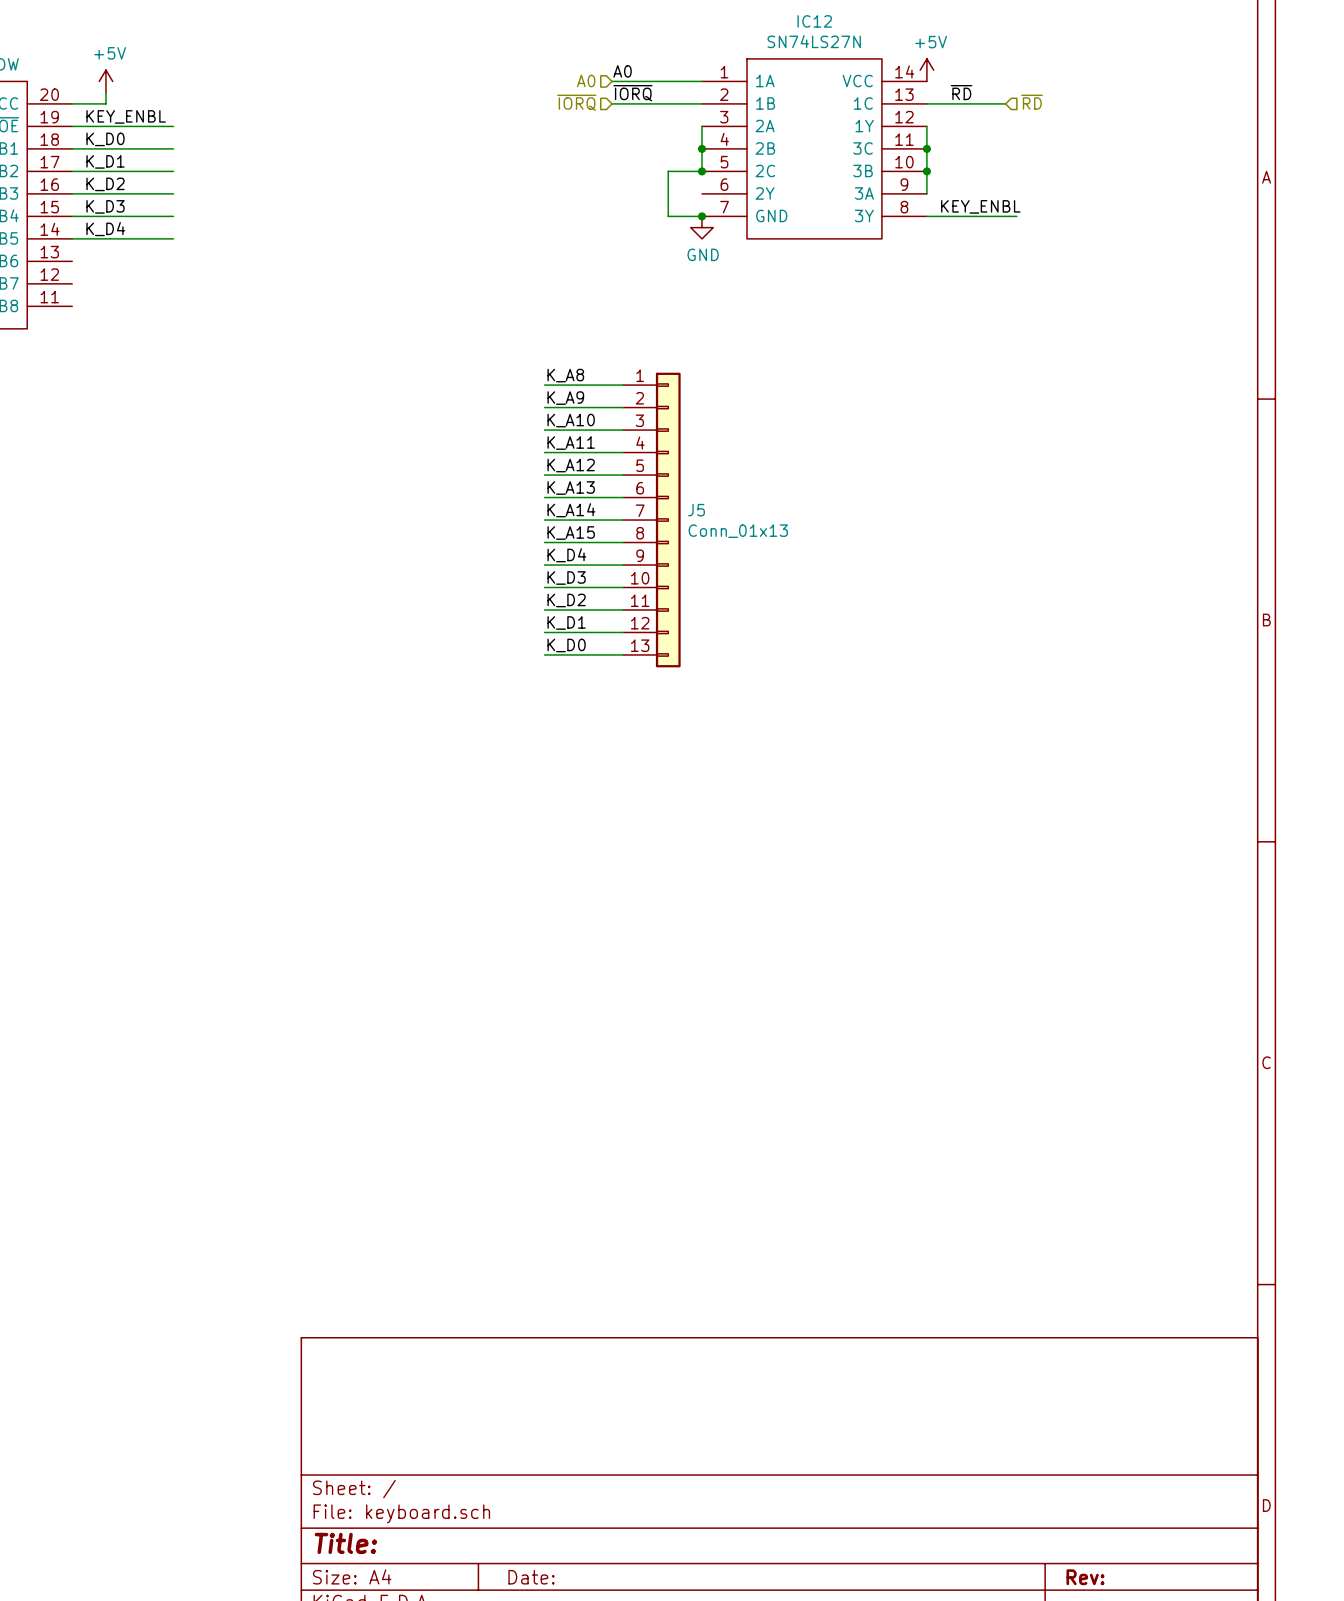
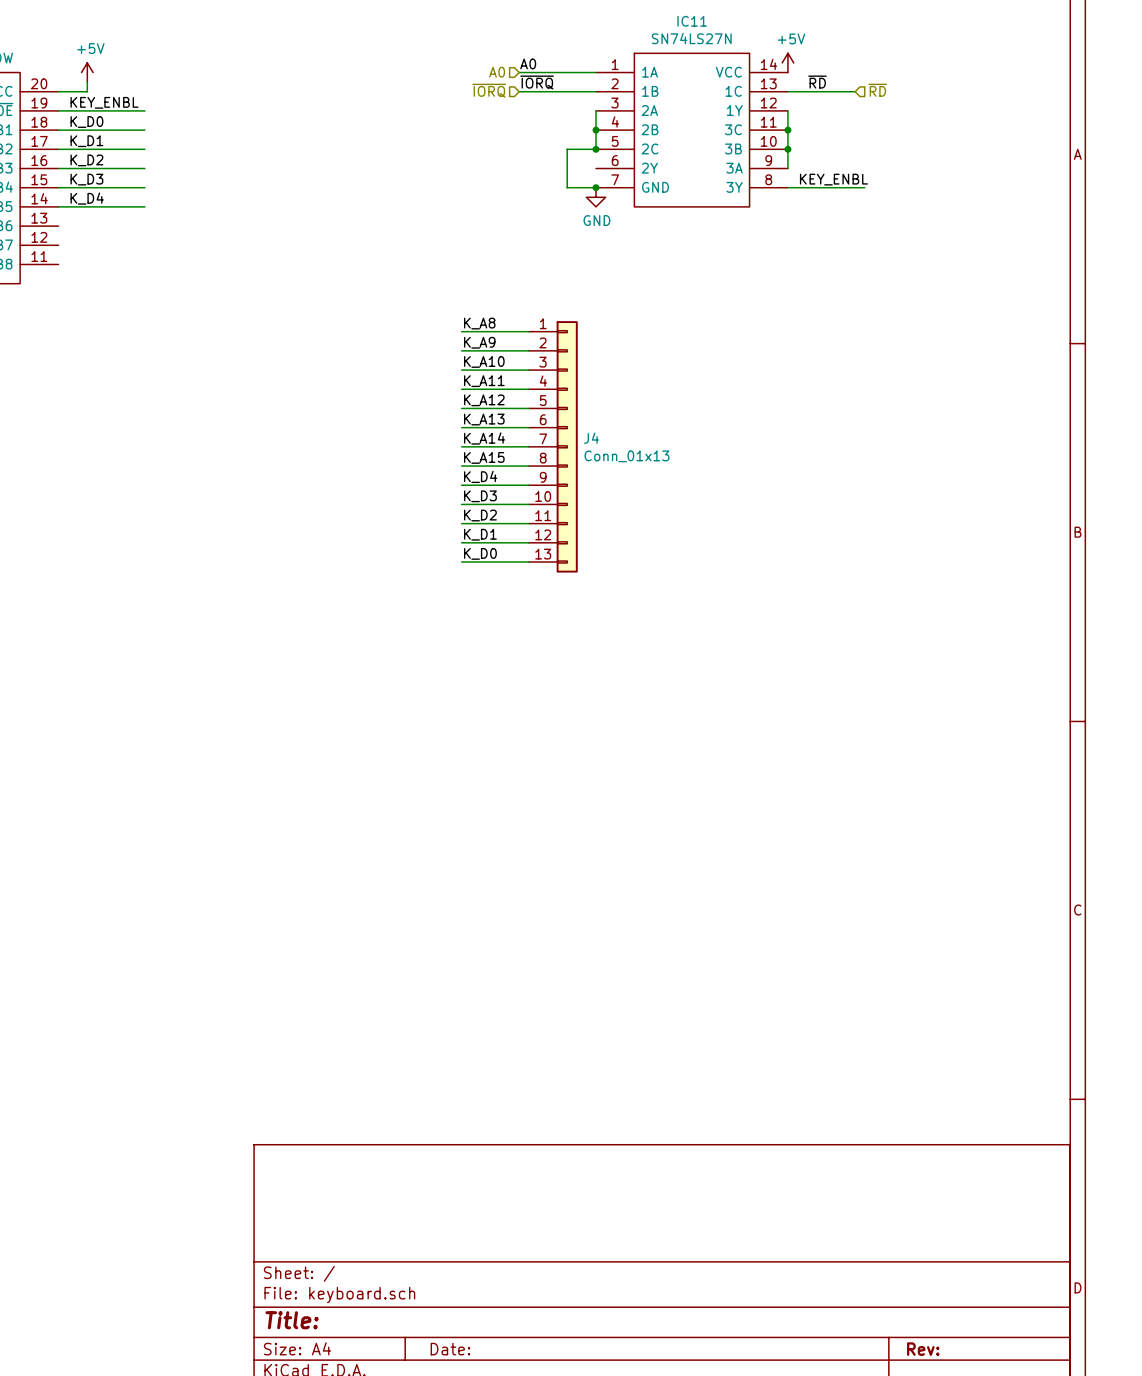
IC12 name: IC12 (814, 21) -> IC11 (692, 21)
J5 name: J5 (696, 510) -> J4 (591, 438)

